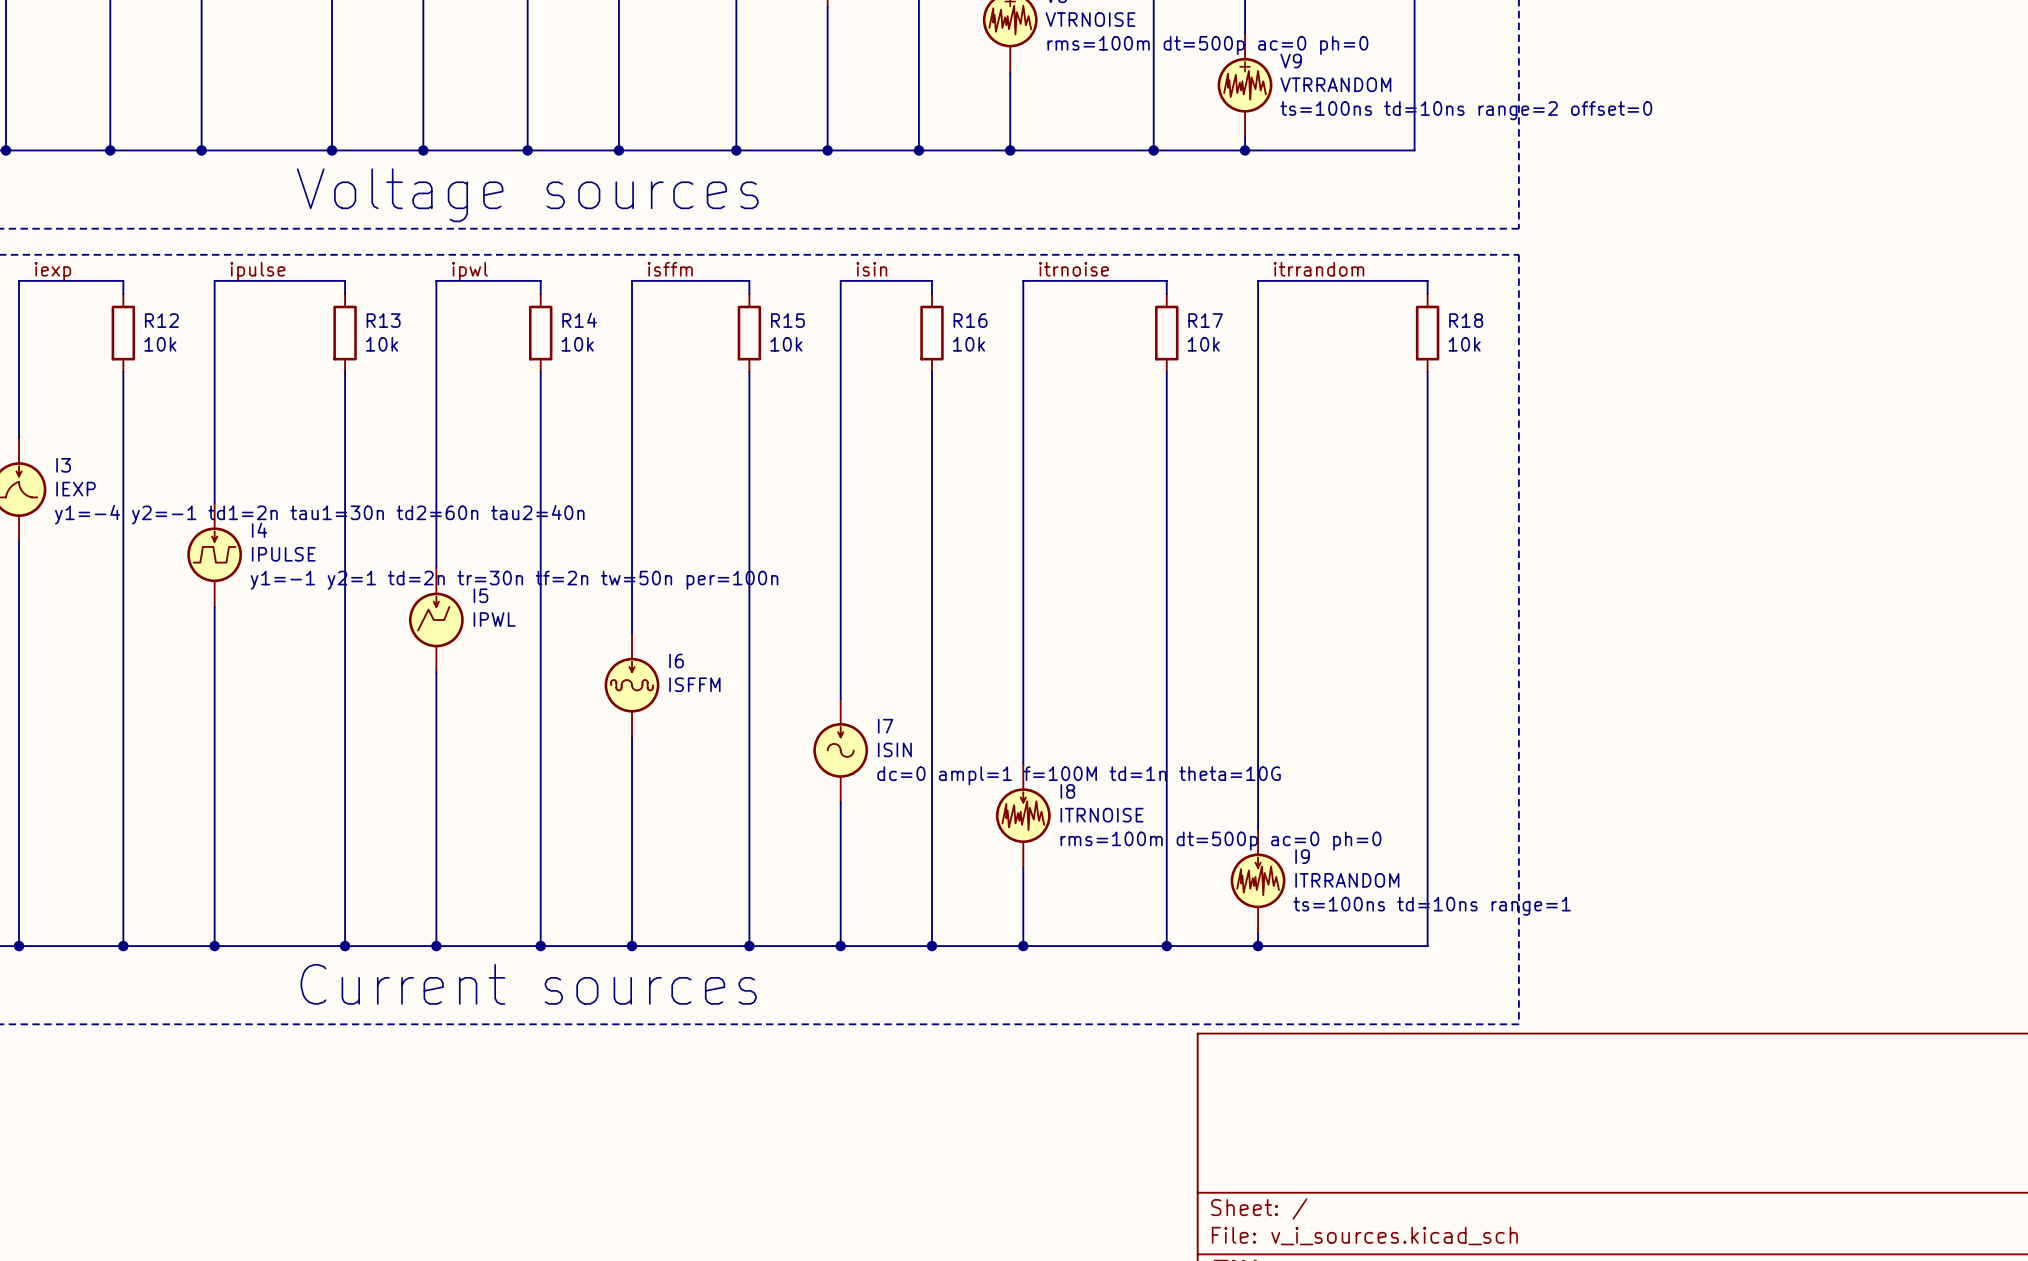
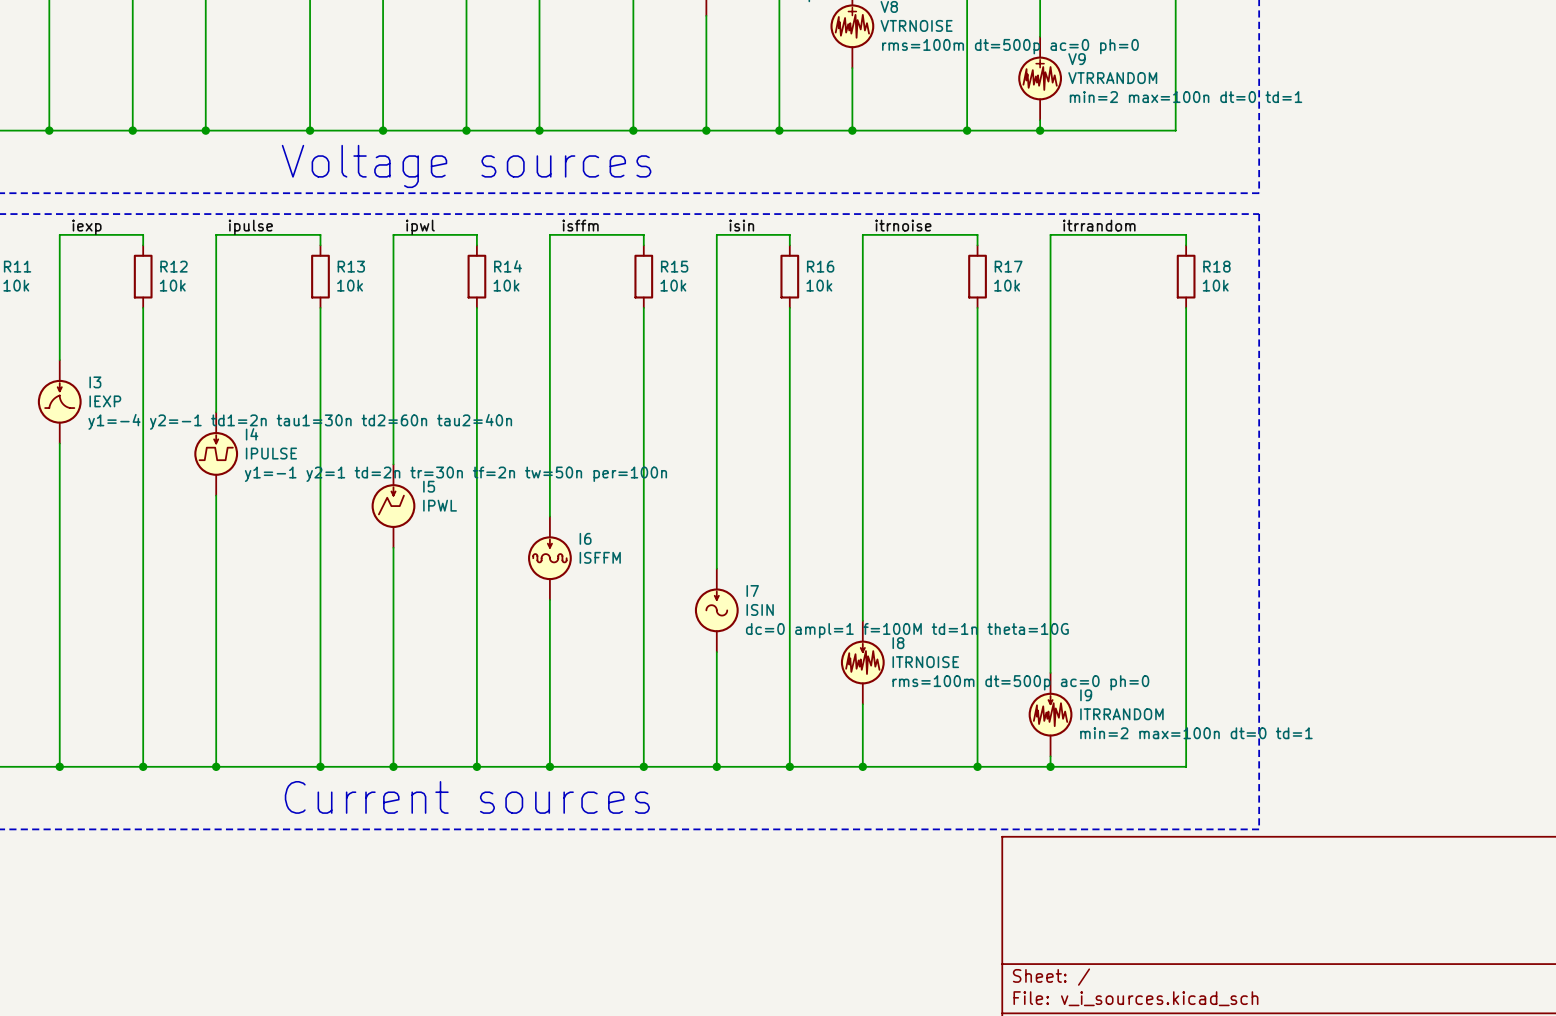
V9 text: ts=100ns td=10ns range=2 offset=0 (1466, 110) -> min=2 max=100n dt=0 td=1 (1186, 97)
I9 text: ts=100ns td=10ns range=1 (1432, 906) -> min=2 max=100n dt=0 td=1 (1196, 733)

